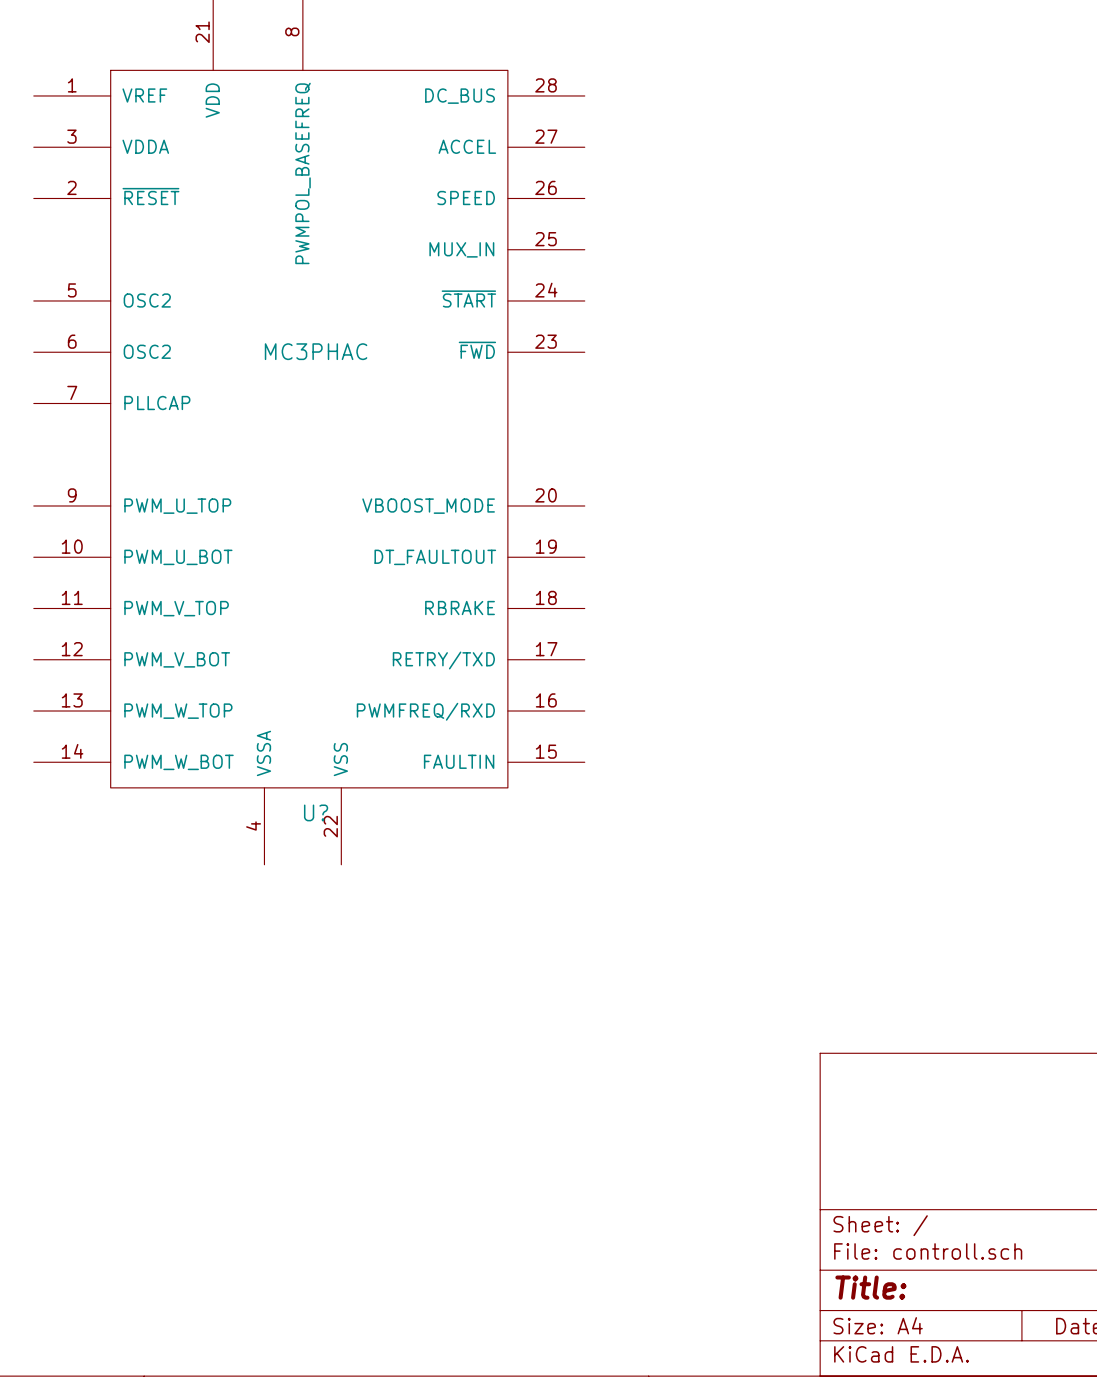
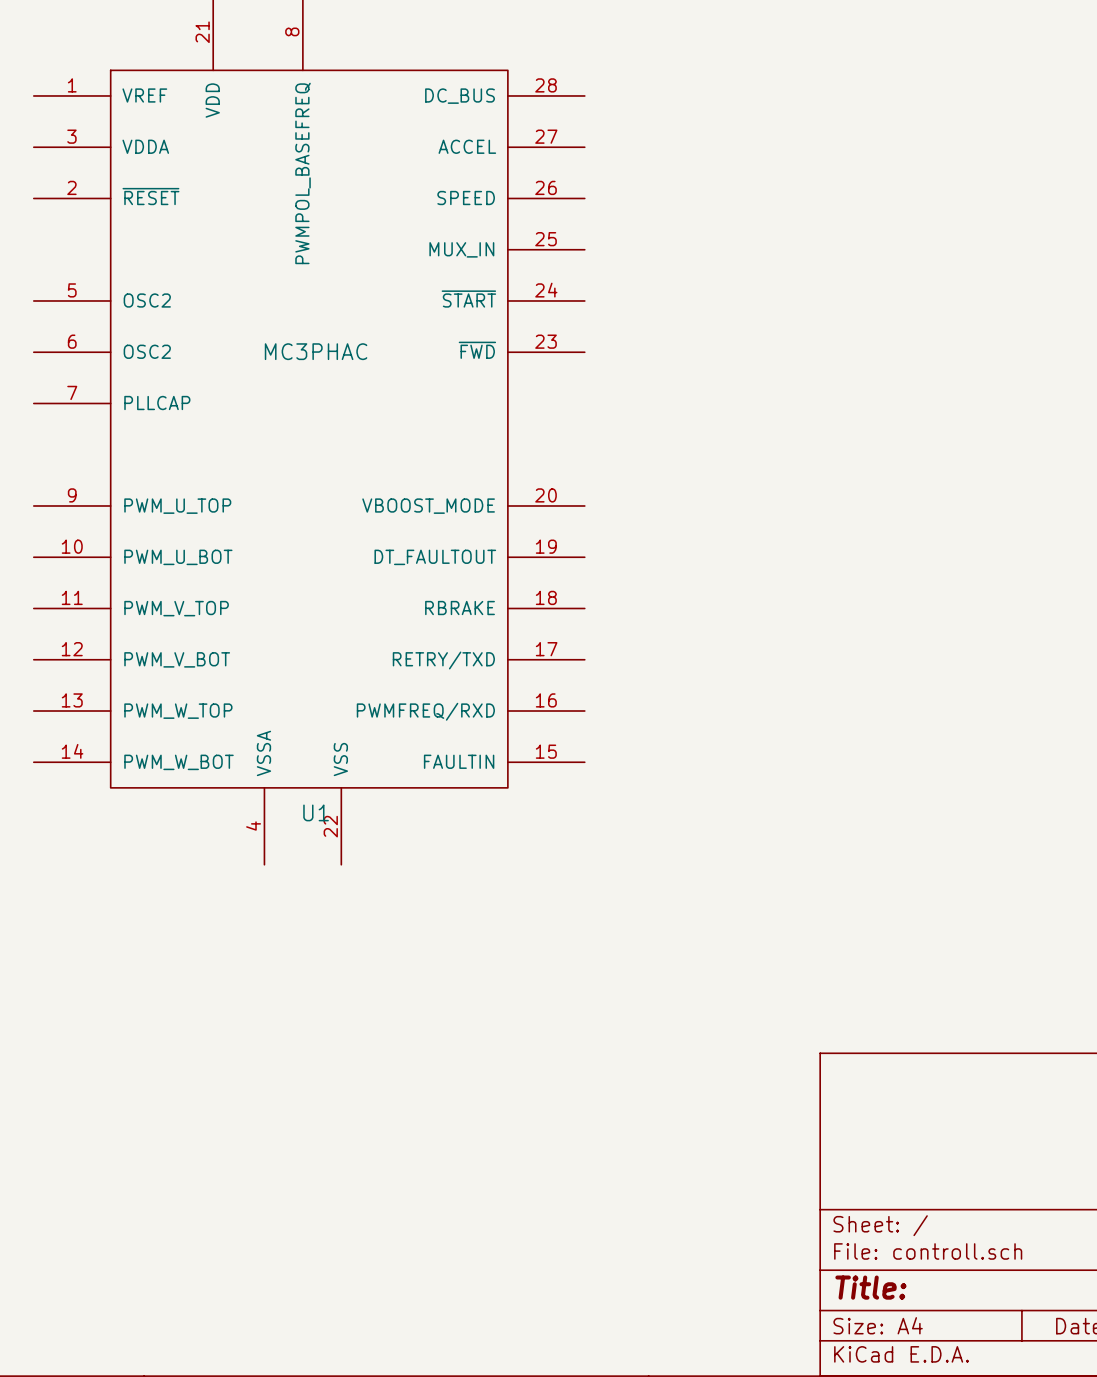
U? name: U? (316, 812) -> U1 (316, 812)

